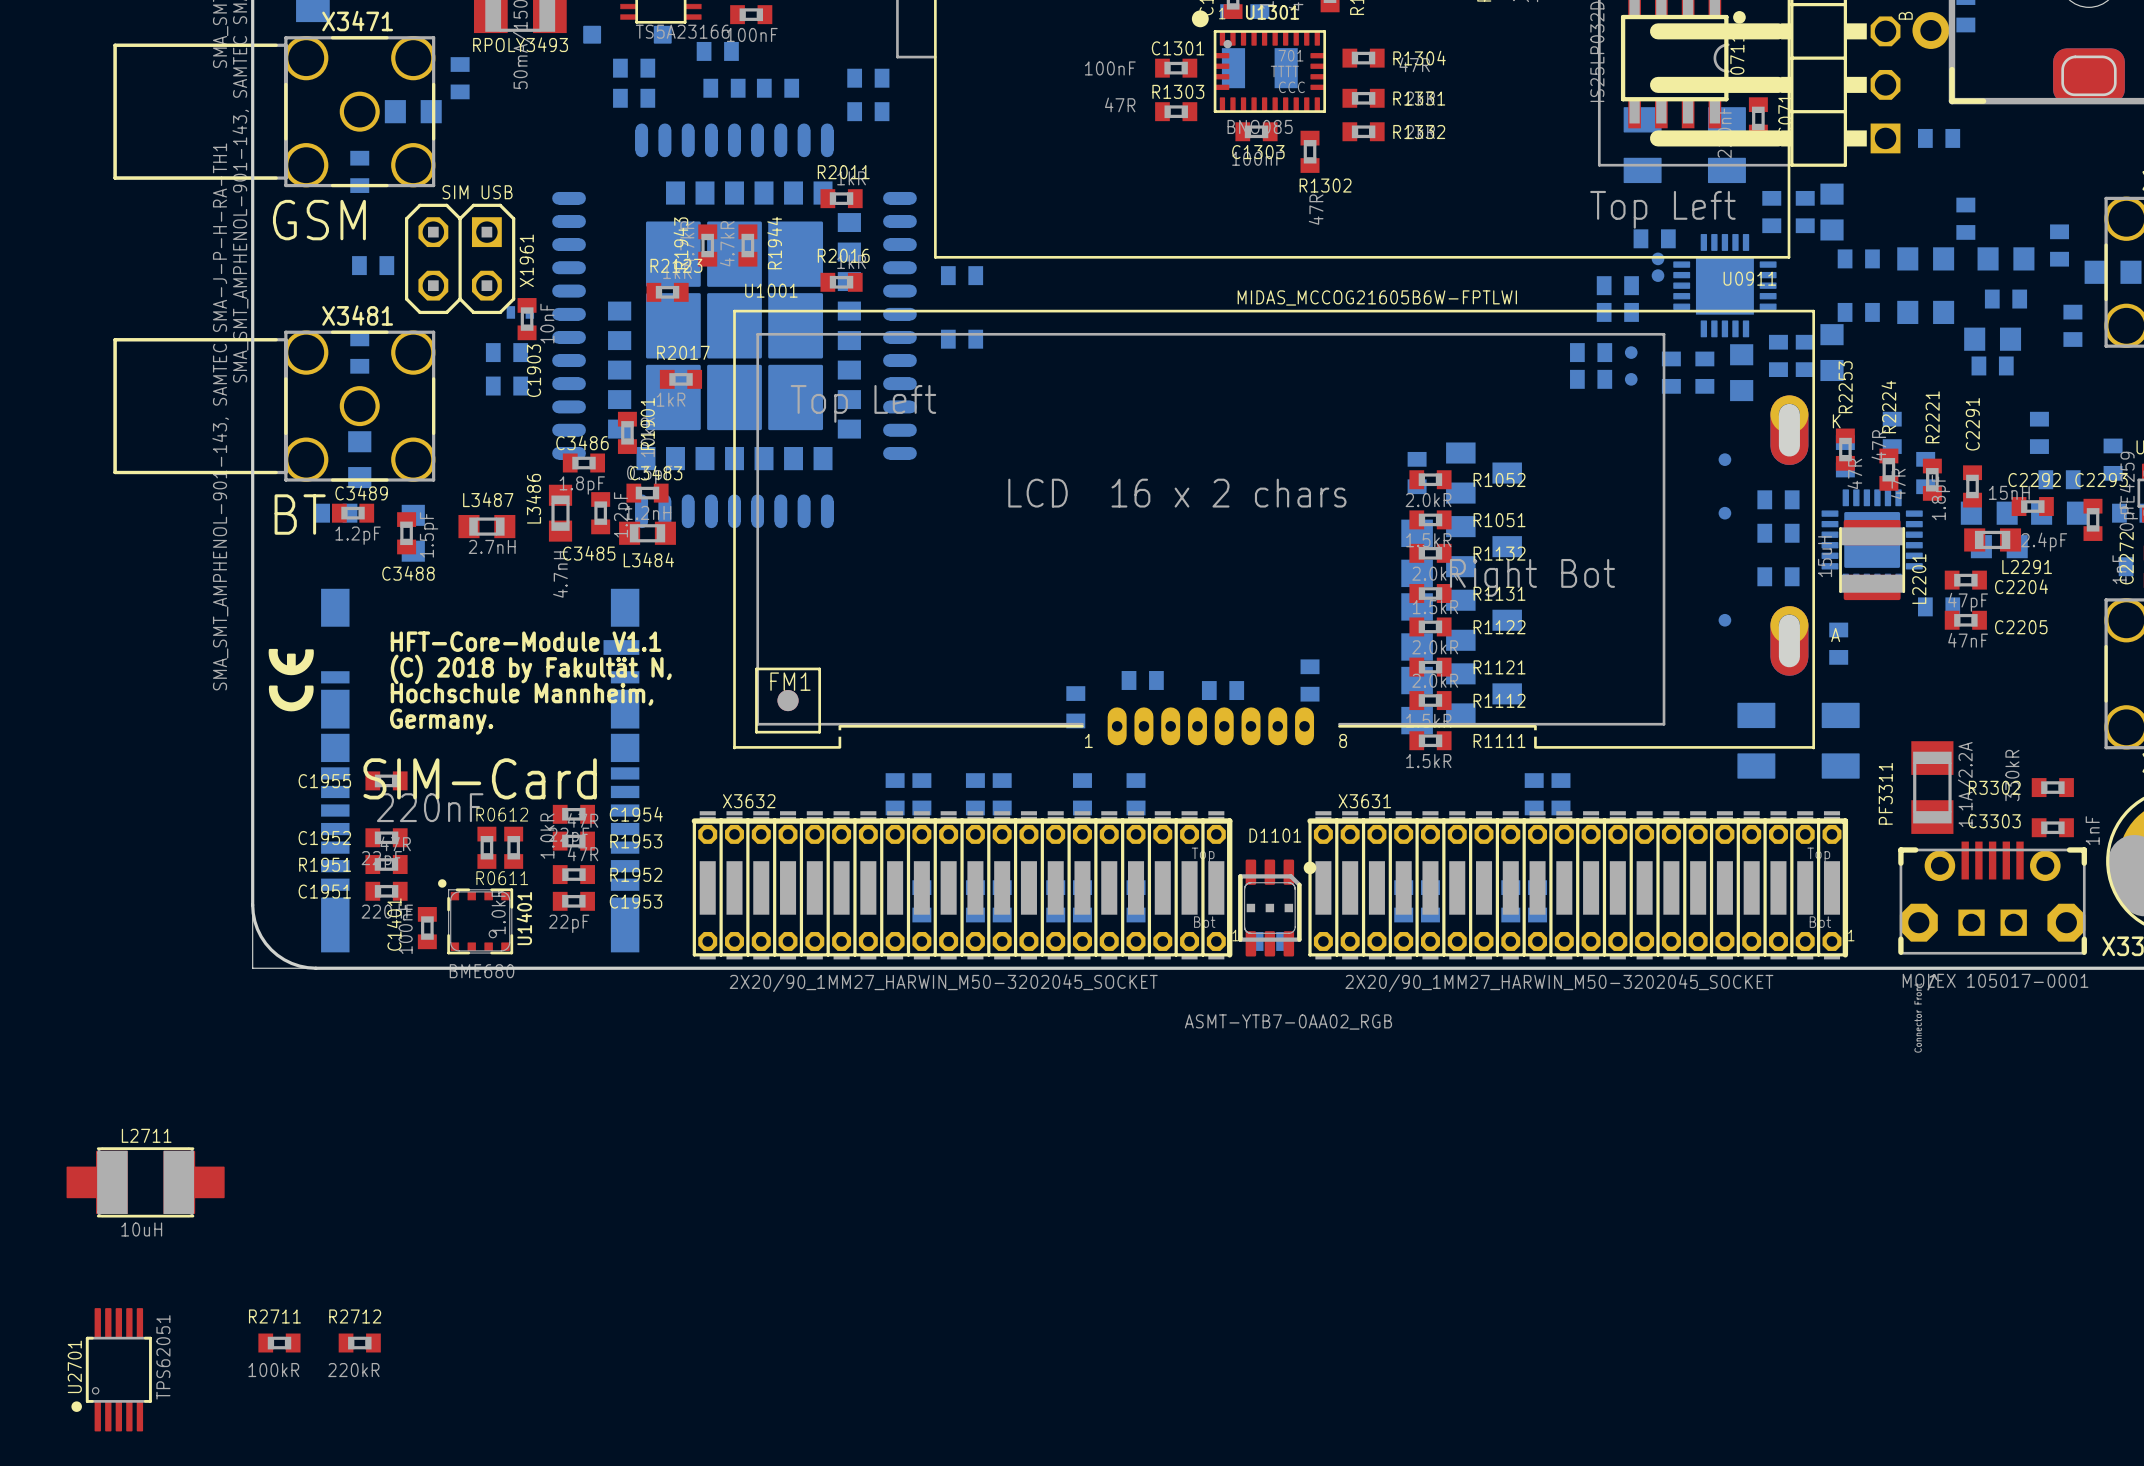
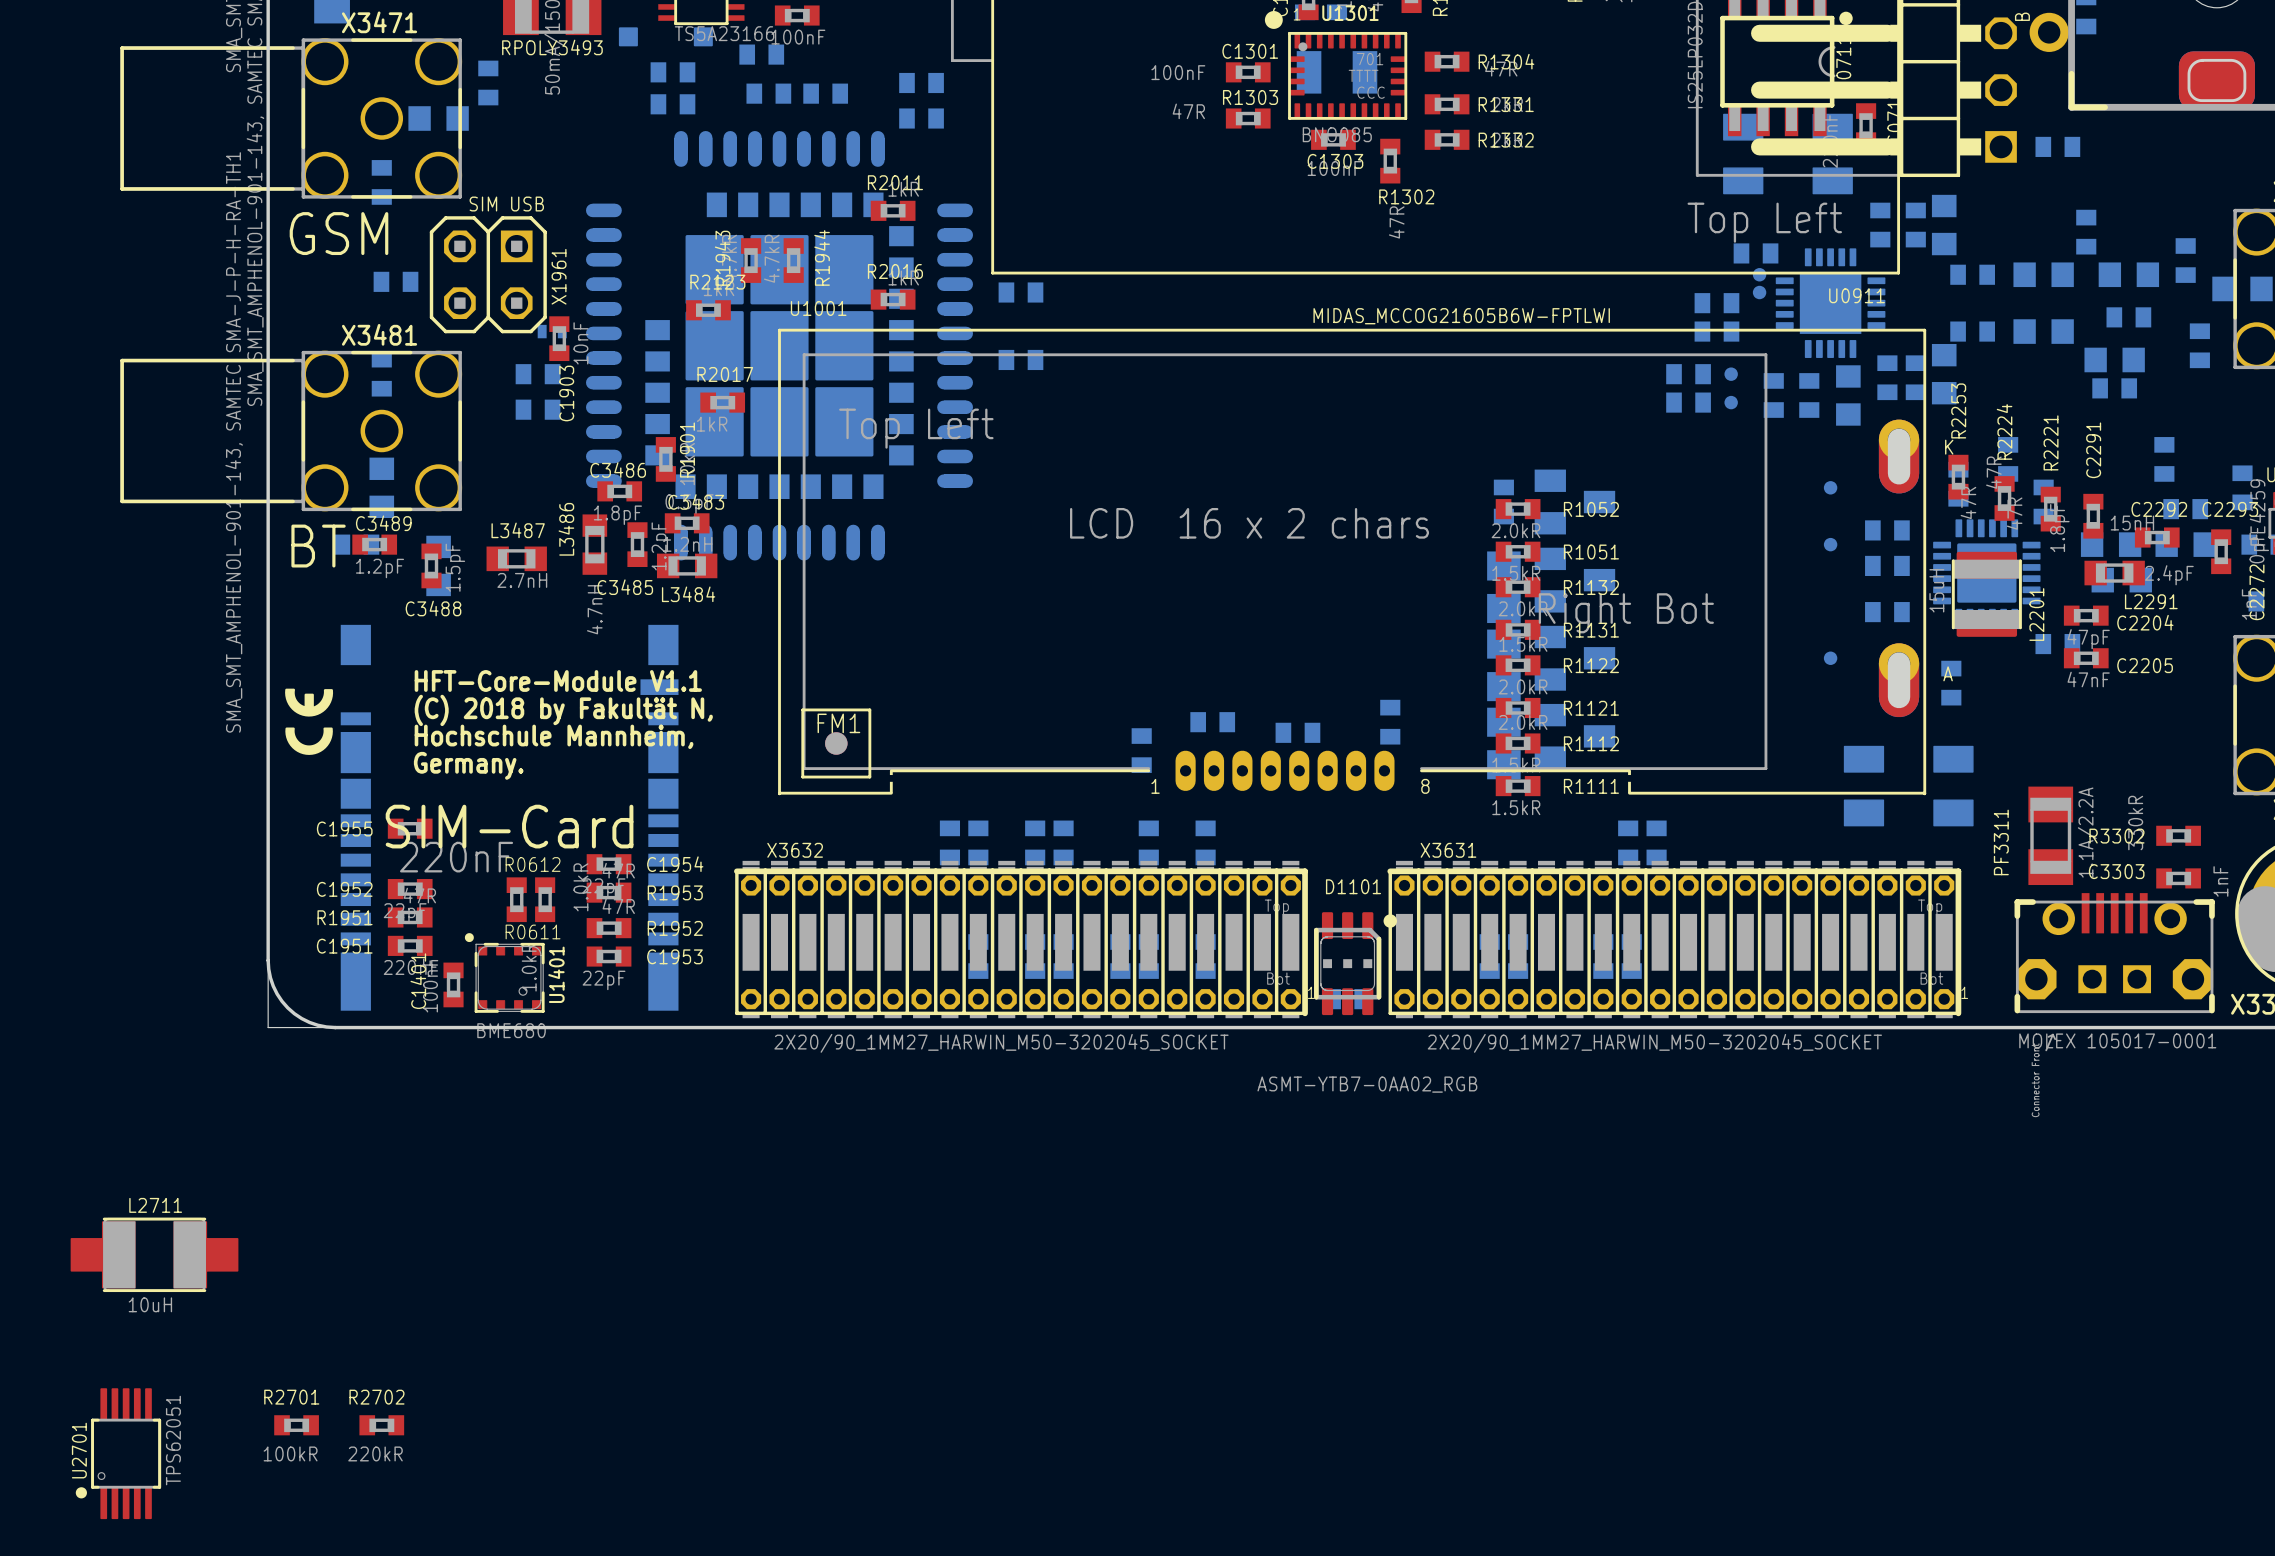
R2711 name: R2711 (274, 1316) -> R2701 (291, 1397)
R2712 name: R2712 (355, 1316) -> R2702 (376, 1397)

